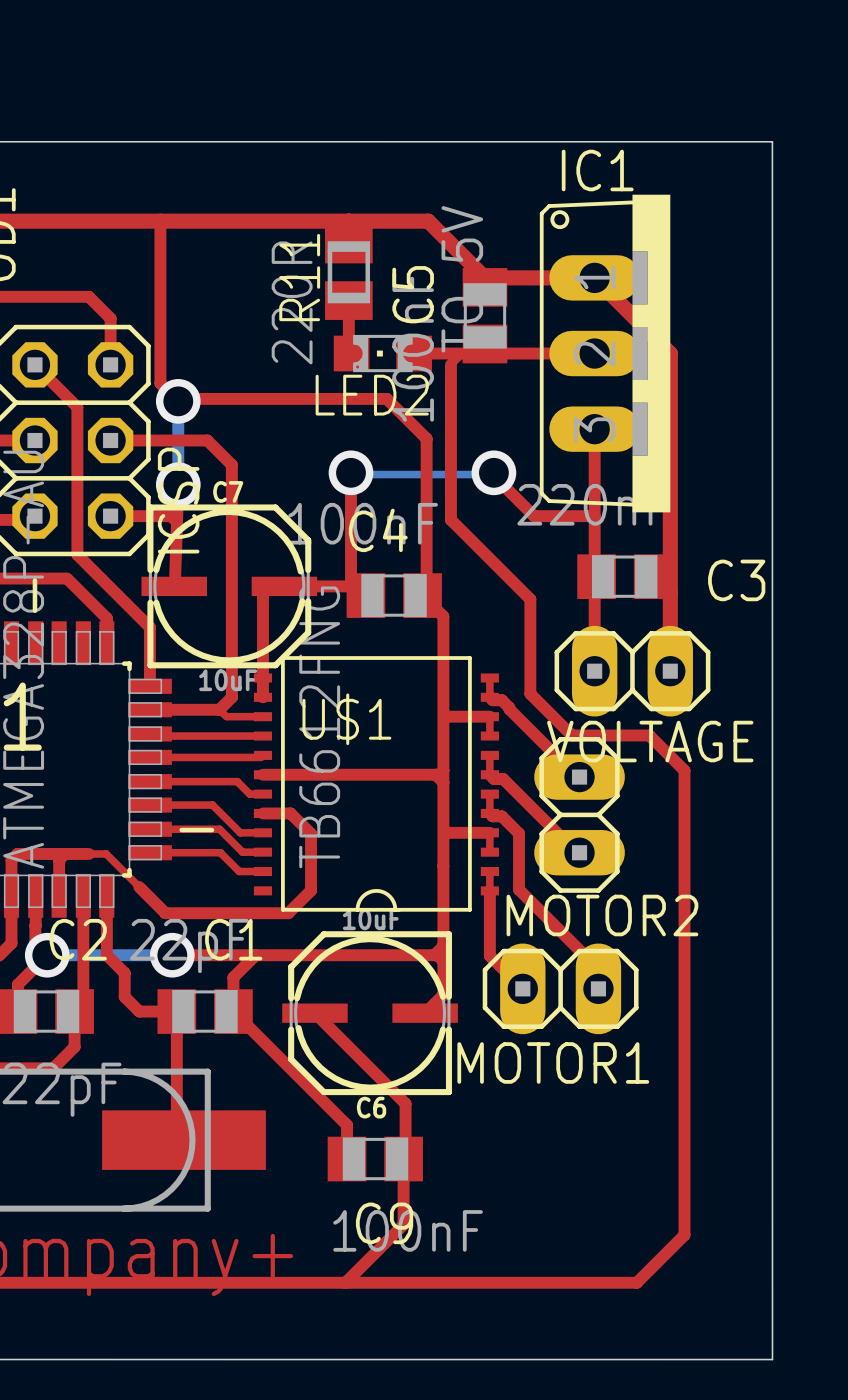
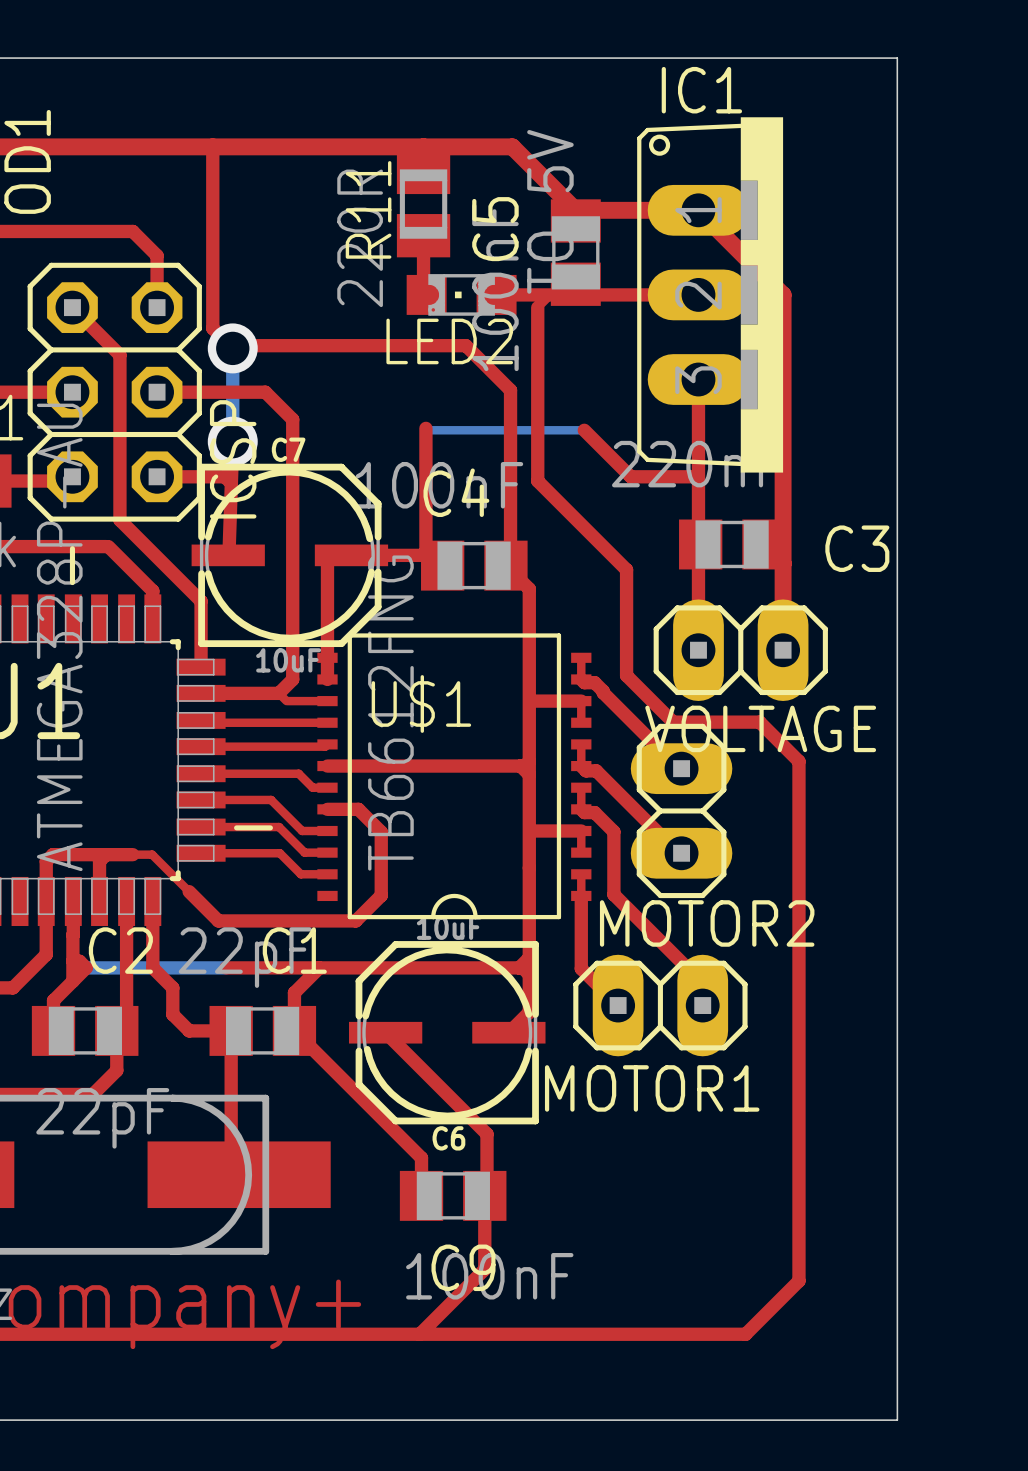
via: (350, 472) -> none
via: (493, 472) -> none
via: (47, 955) -> none
via: (172, 955) -> none

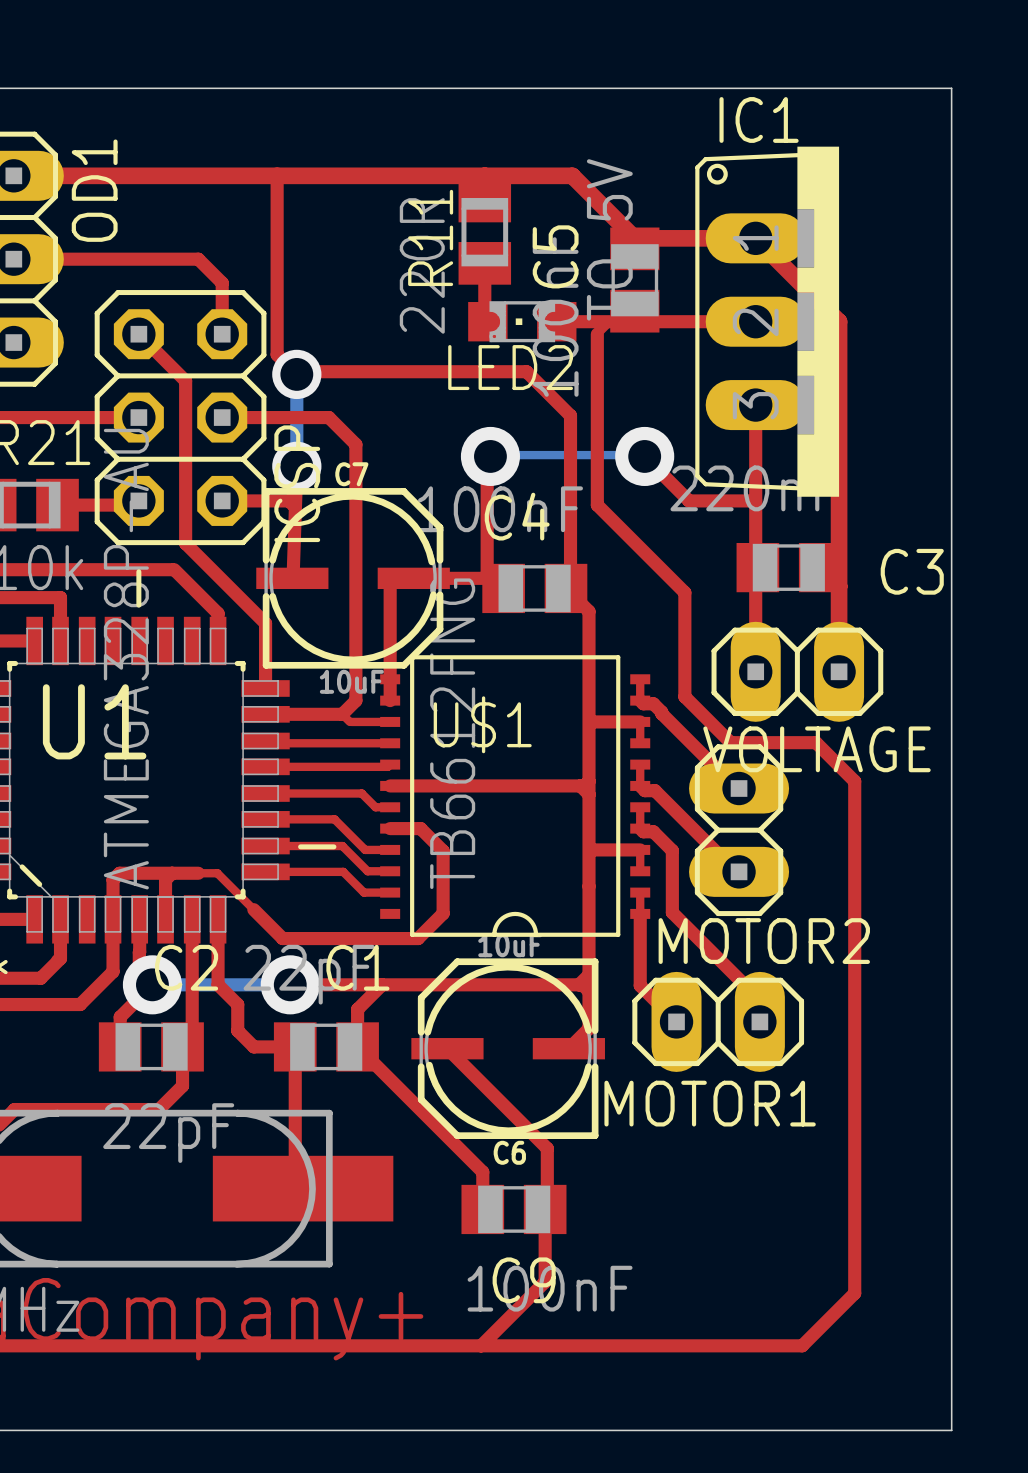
via: none -> (490, 456)
via: none -> (644, 456)
via: none -> (152, 984)
via: none -> (290, 984)

